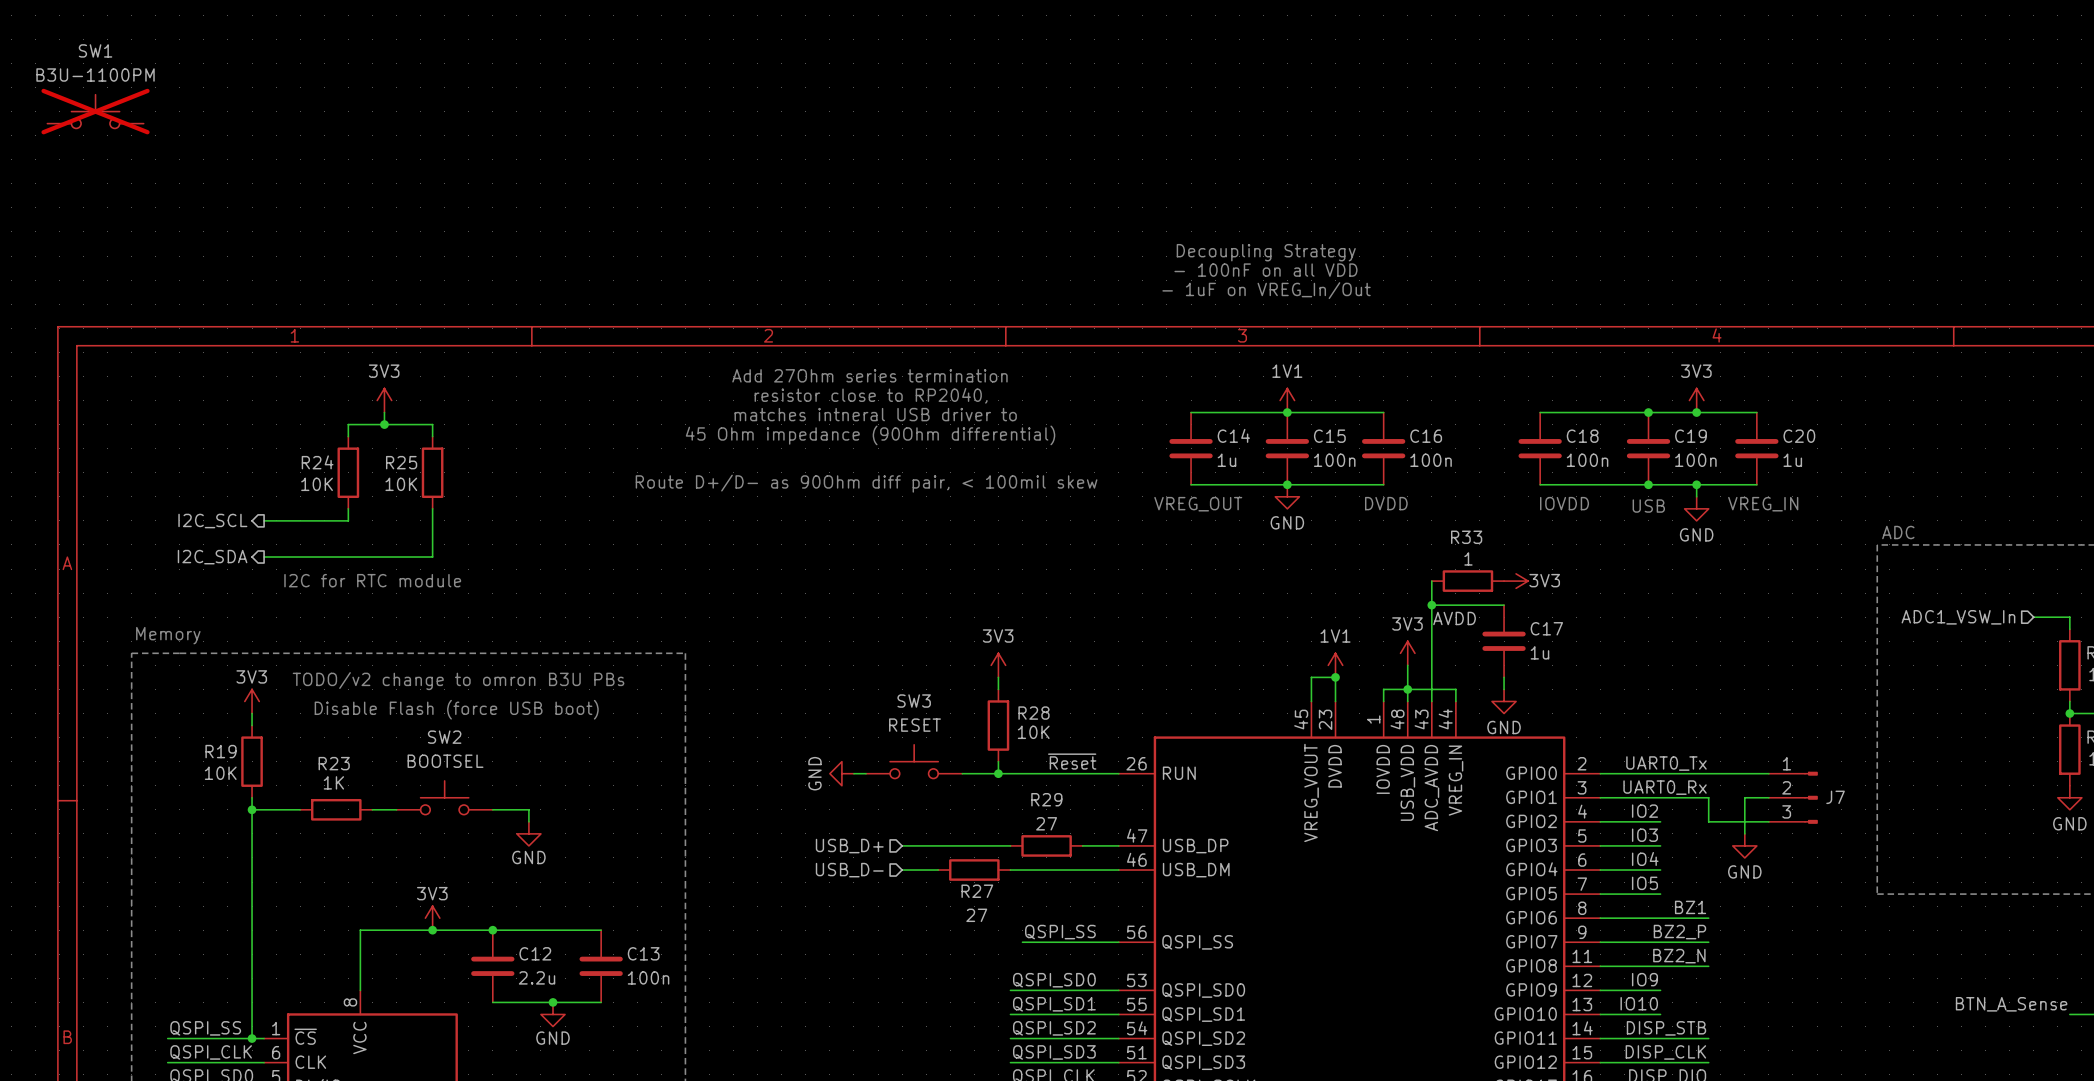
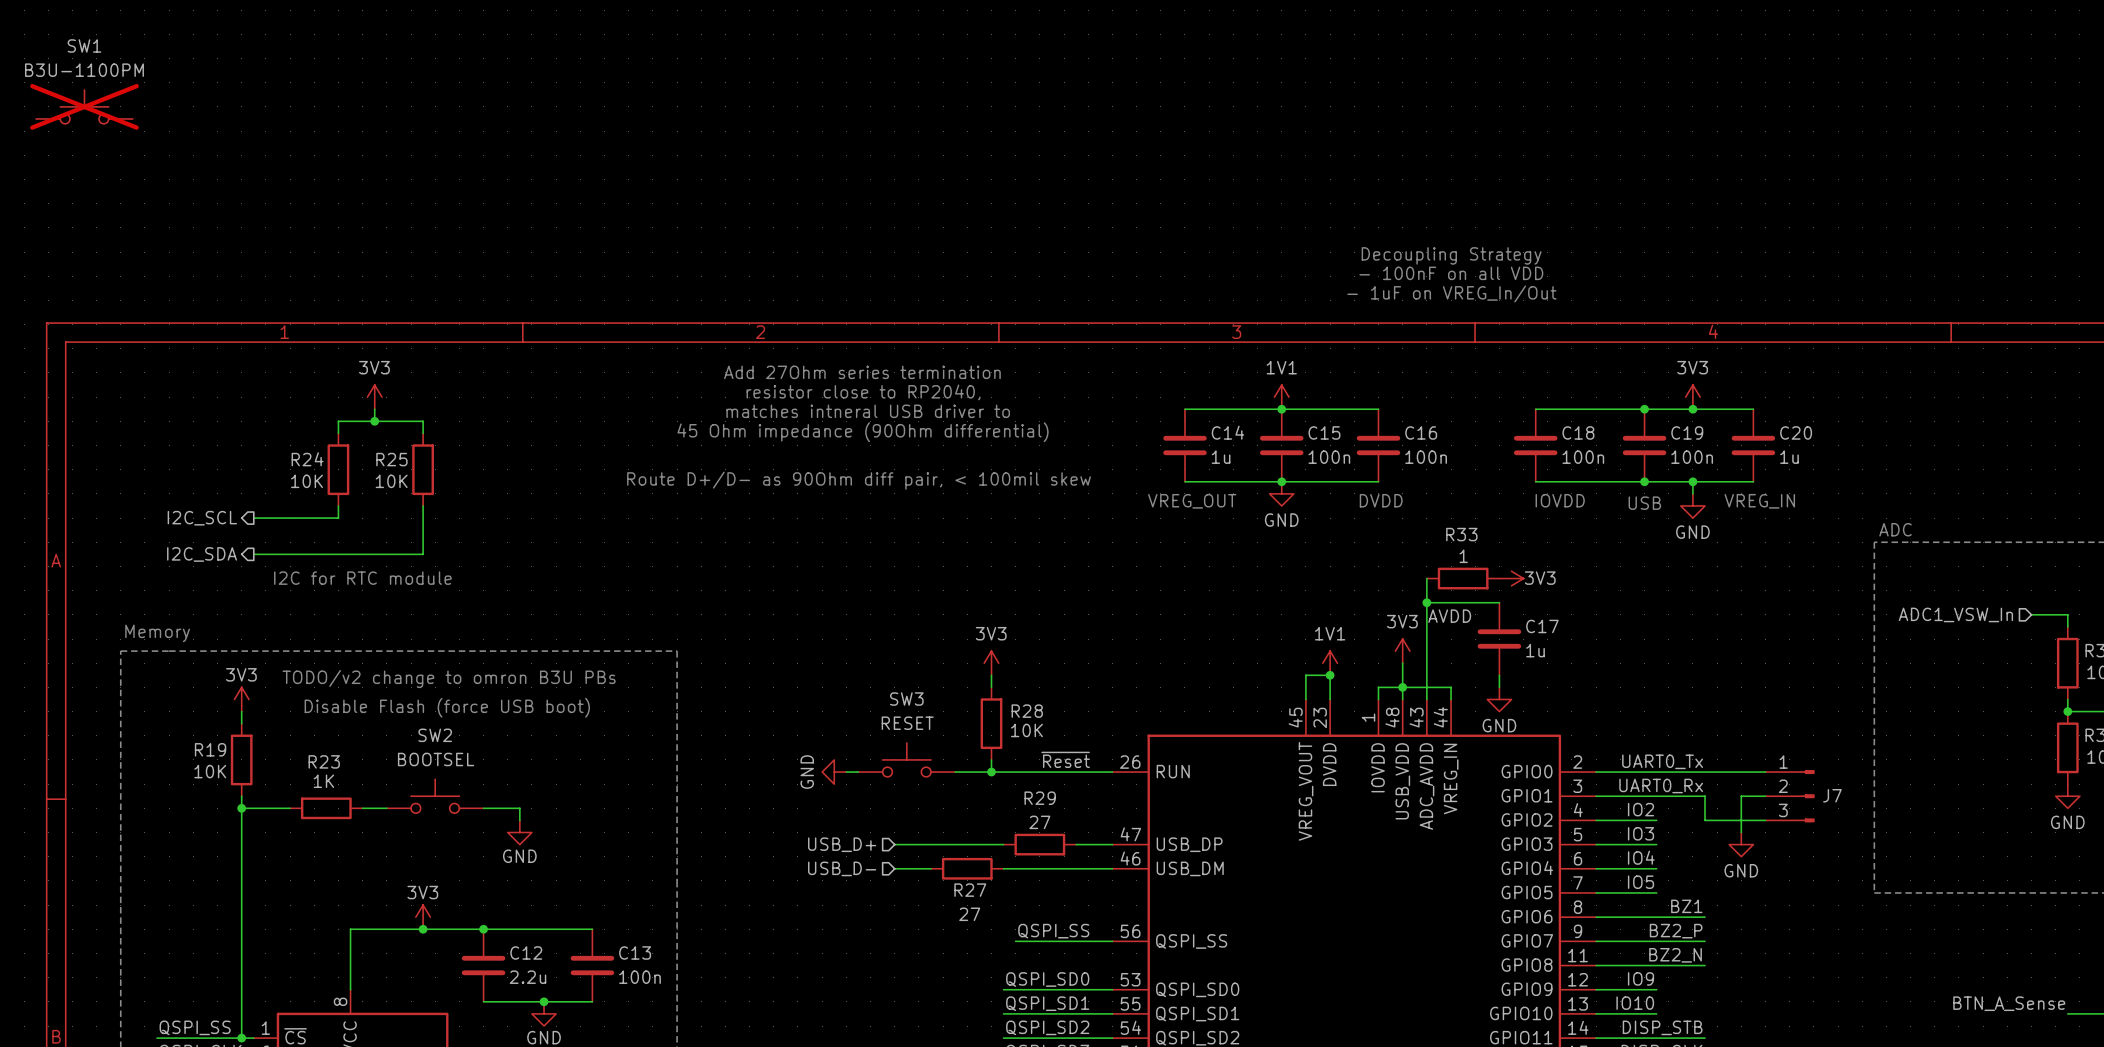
text position: Decoupling Strategy (1266, 252) -> Decoupling Strategy (1451, 255)
text position: - 100nF on all VDD (1265, 270) -> - 100nF on all VDD (1451, 273)
text position: - 1uF on VREG_In/Out (1266, 290) -> - 1uF on VREG_In/Out (1451, 293)

